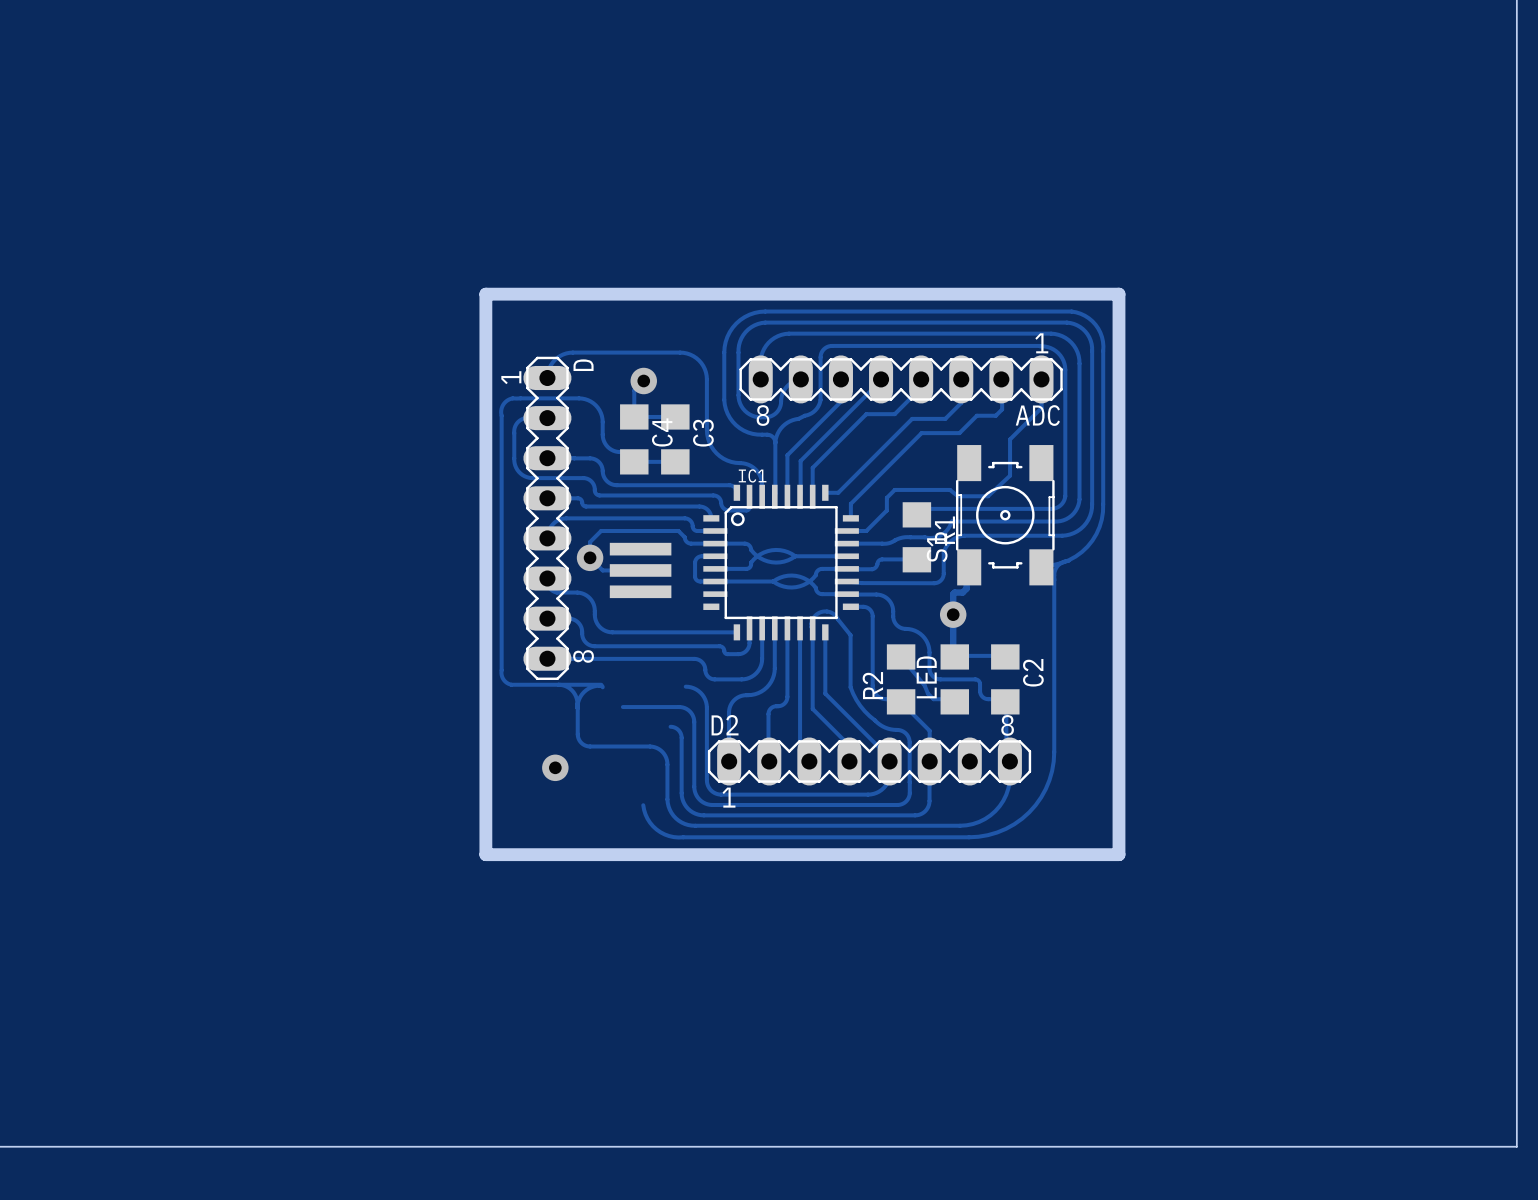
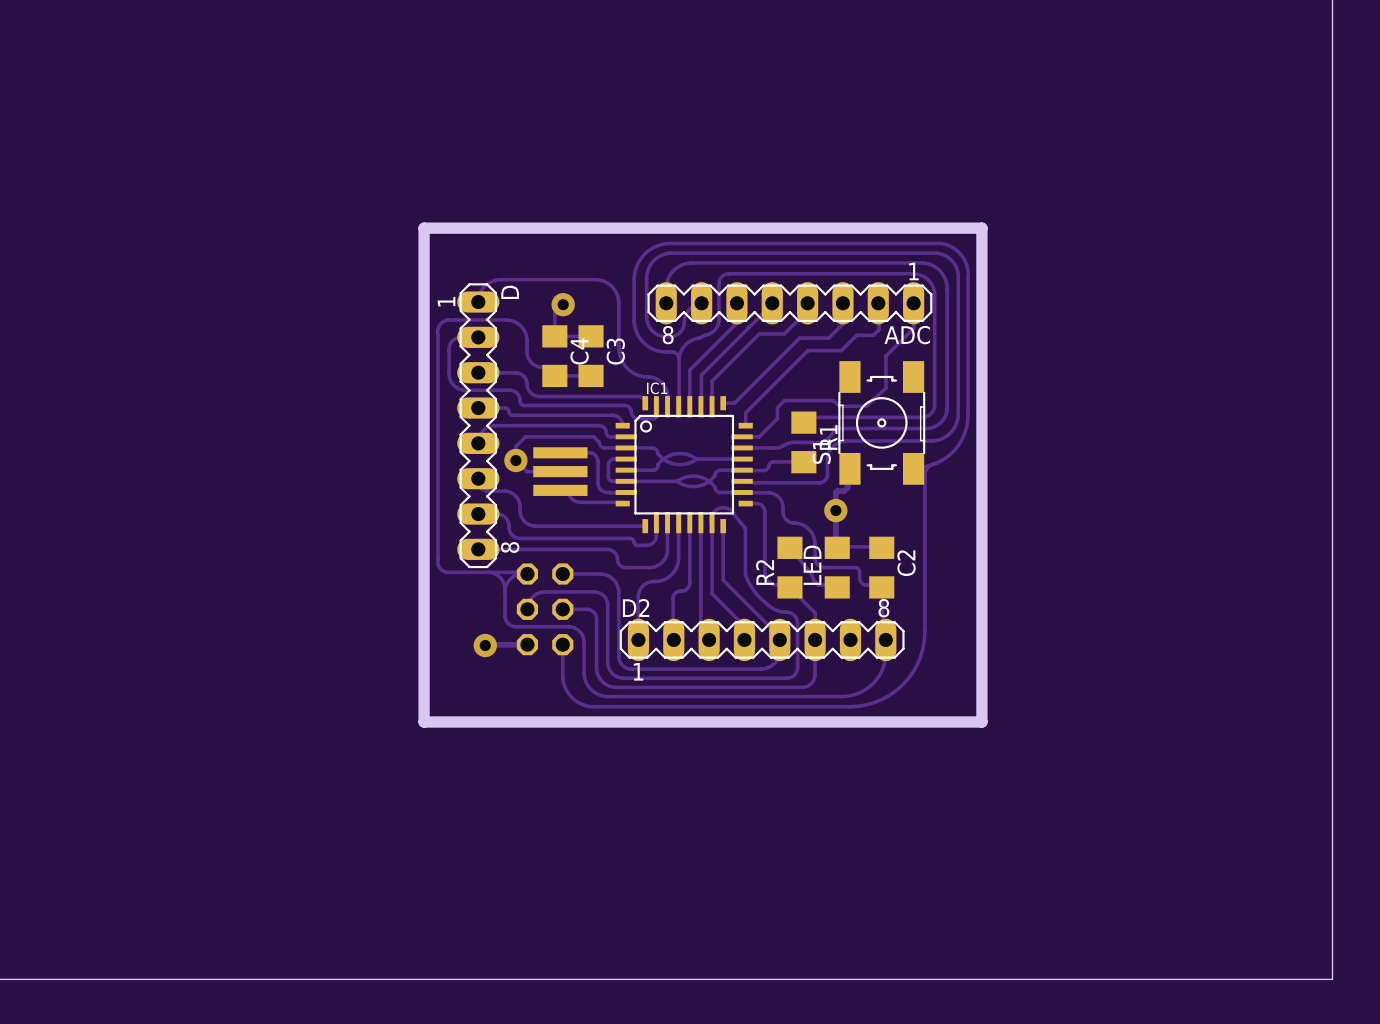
track: none -> (560, 452) (592, 453) (597, 459) (597, 484) (599, 488) (606, 492) (626, 492)
track: none -> (560, 490) (567, 489) (570, 497) (577, 501) (622, 503)
track: none -> (562, 574) (600, 574)
track: none -> (544, 591) (532, 597) (527, 609)
part: none -> (545, 609)
track: none -> (562, 609) (586, 609)
track: none -> (562, 644) (562, 678)
track: none -> (526, 644) (485, 645)

